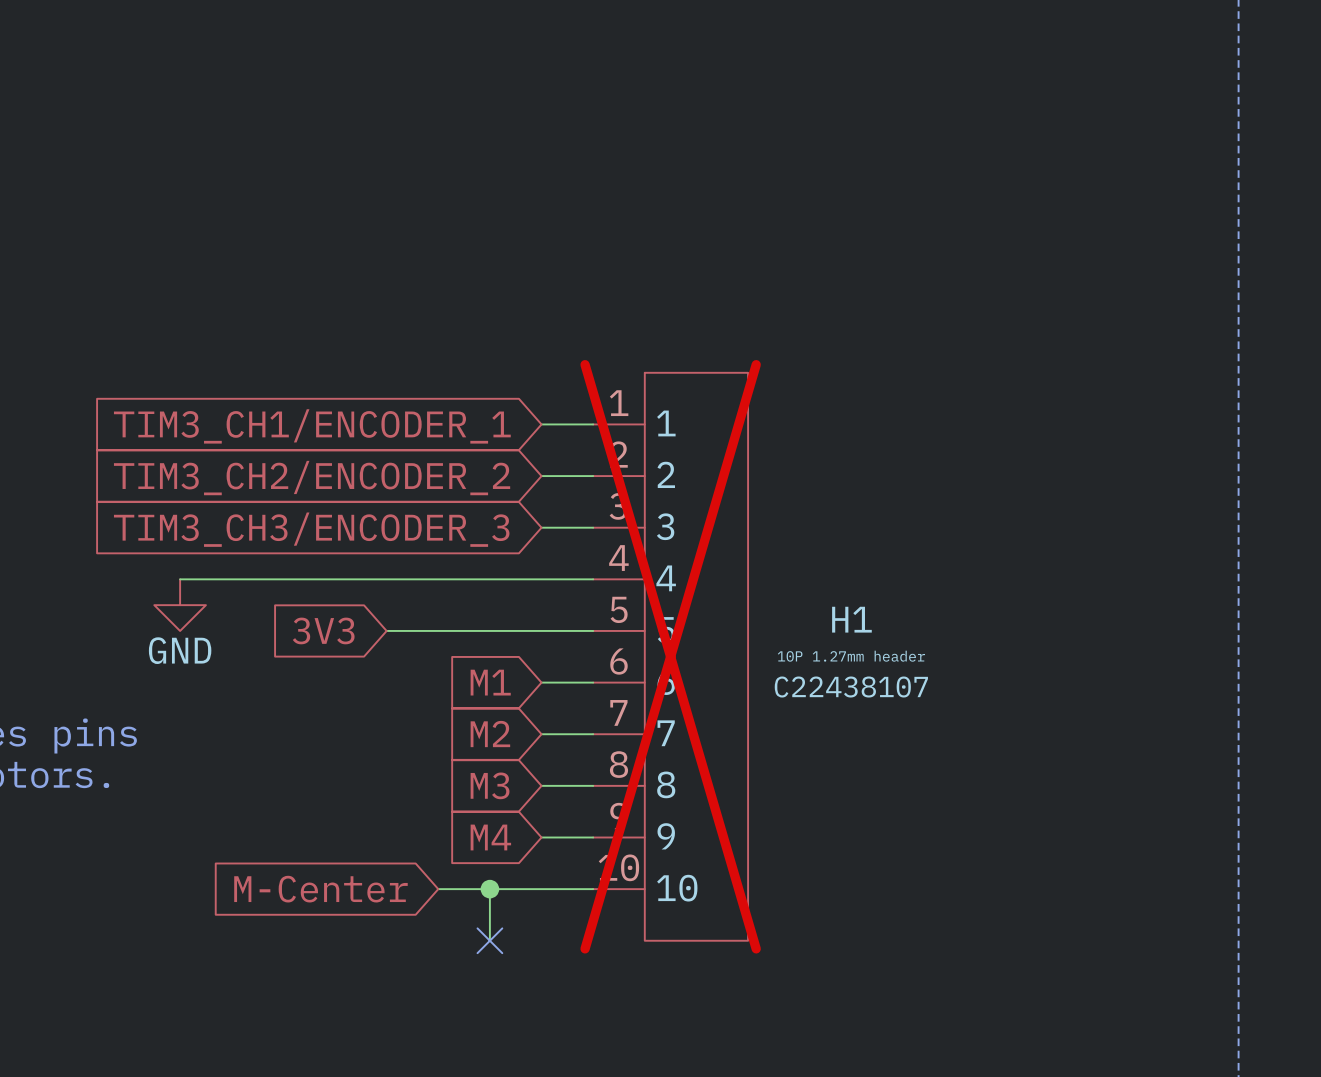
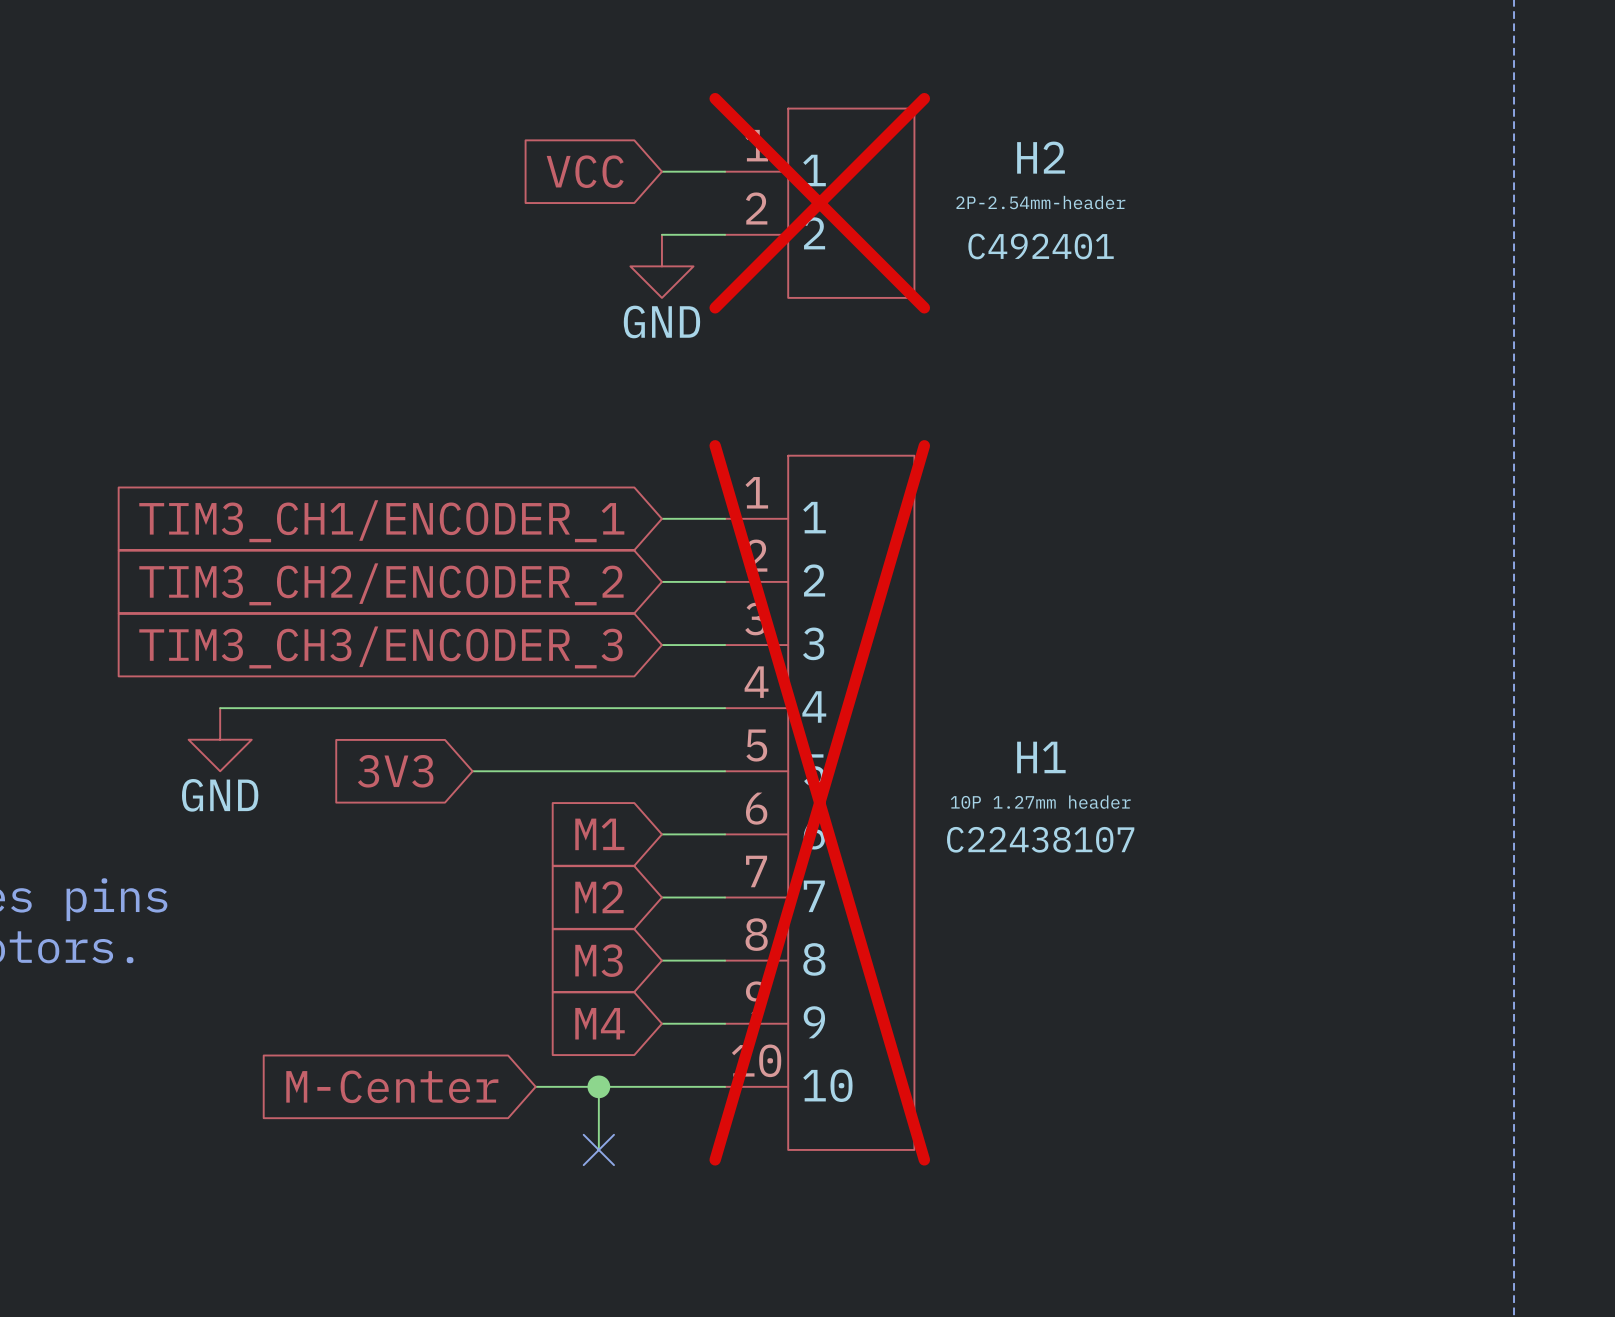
global label: none -> VCC (585, 171)
wire: none -> (661, 171) (725, 171)
H2: none -> 2P-2.54mm-header (819, 203)
wire: none -> (661, 234) (725, 234)
power symbol: none -> GND (661, 266)

